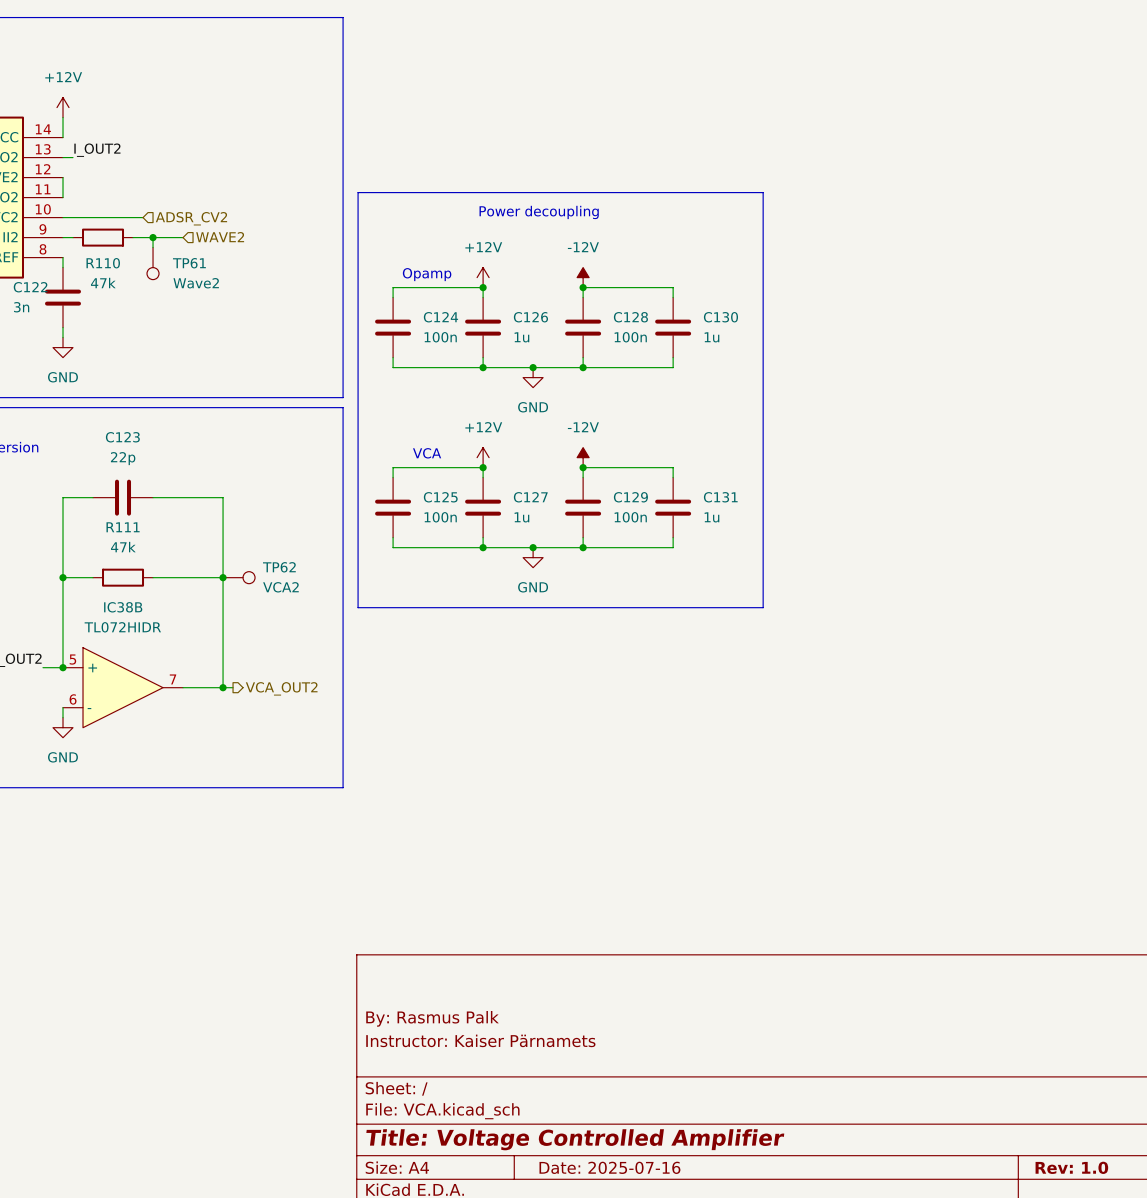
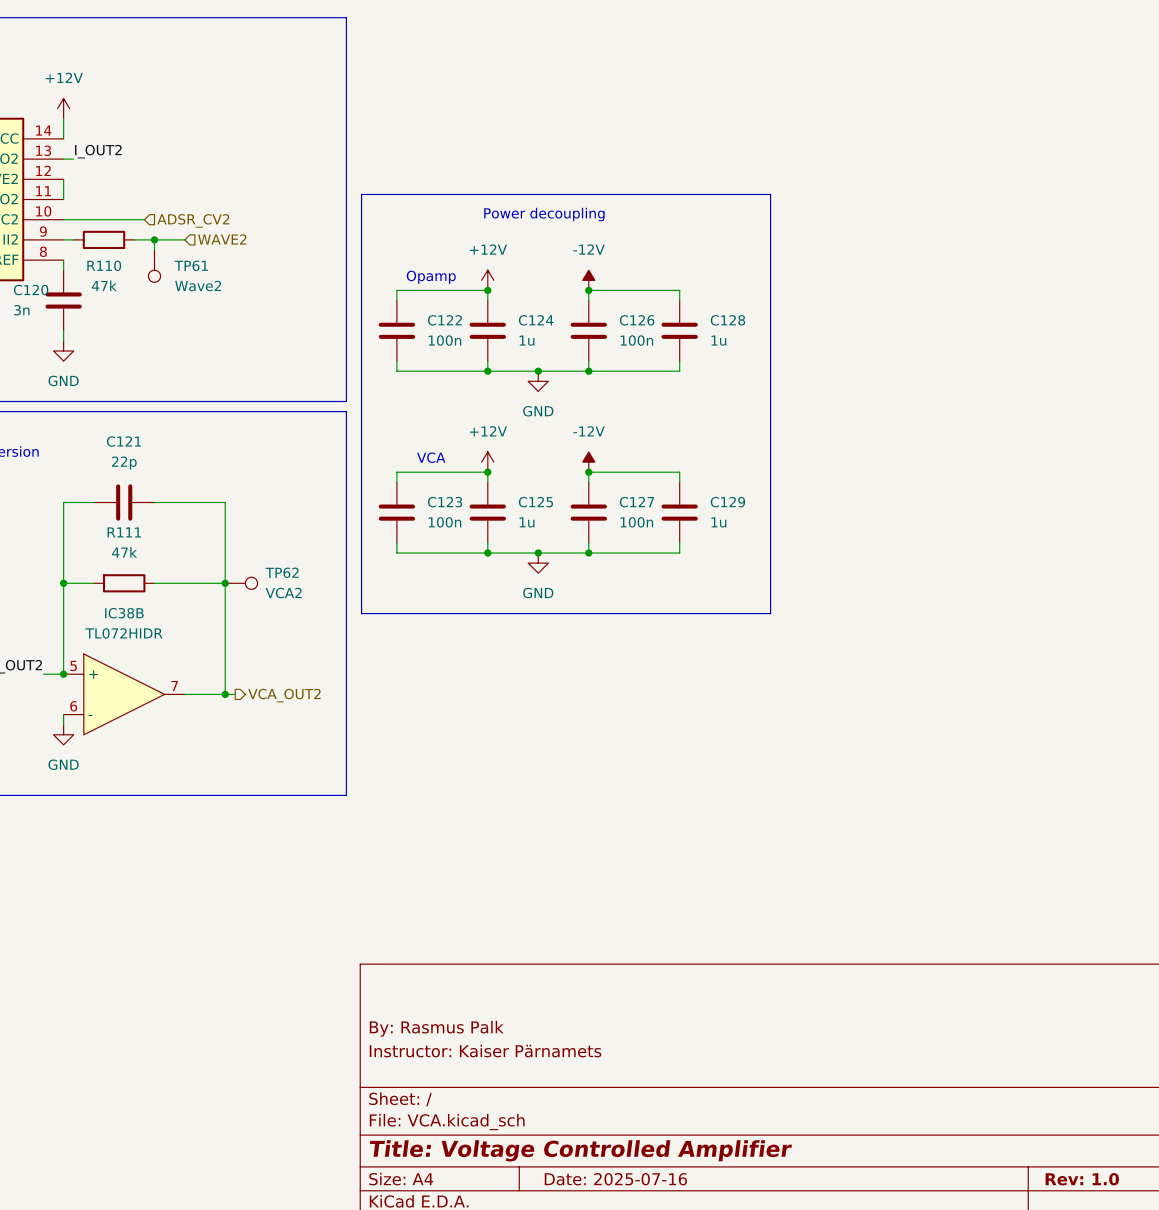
C122 name: C122 (30, 287) -> C120 (31, 290)
C124 name: C124 (440, 317) -> C122 (444, 320)
C126 name: C126 (530, 317) -> C124 (536, 320)
C128 name: C128 (630, 317) -> C126 (637, 320)
C130 name: C130 (720, 317) -> C128 (727, 320)
C123 name: C123 (122, 437) -> C121 (123, 441)
C125 name: C125 (440, 497) -> C123 (445, 502)
C127 name: C127 (530, 497) -> C125 (535, 502)
C129 name: C129 (630, 497) -> C127 (636, 502)
C131 name: C131 (720, 497) -> C129 (727, 502)

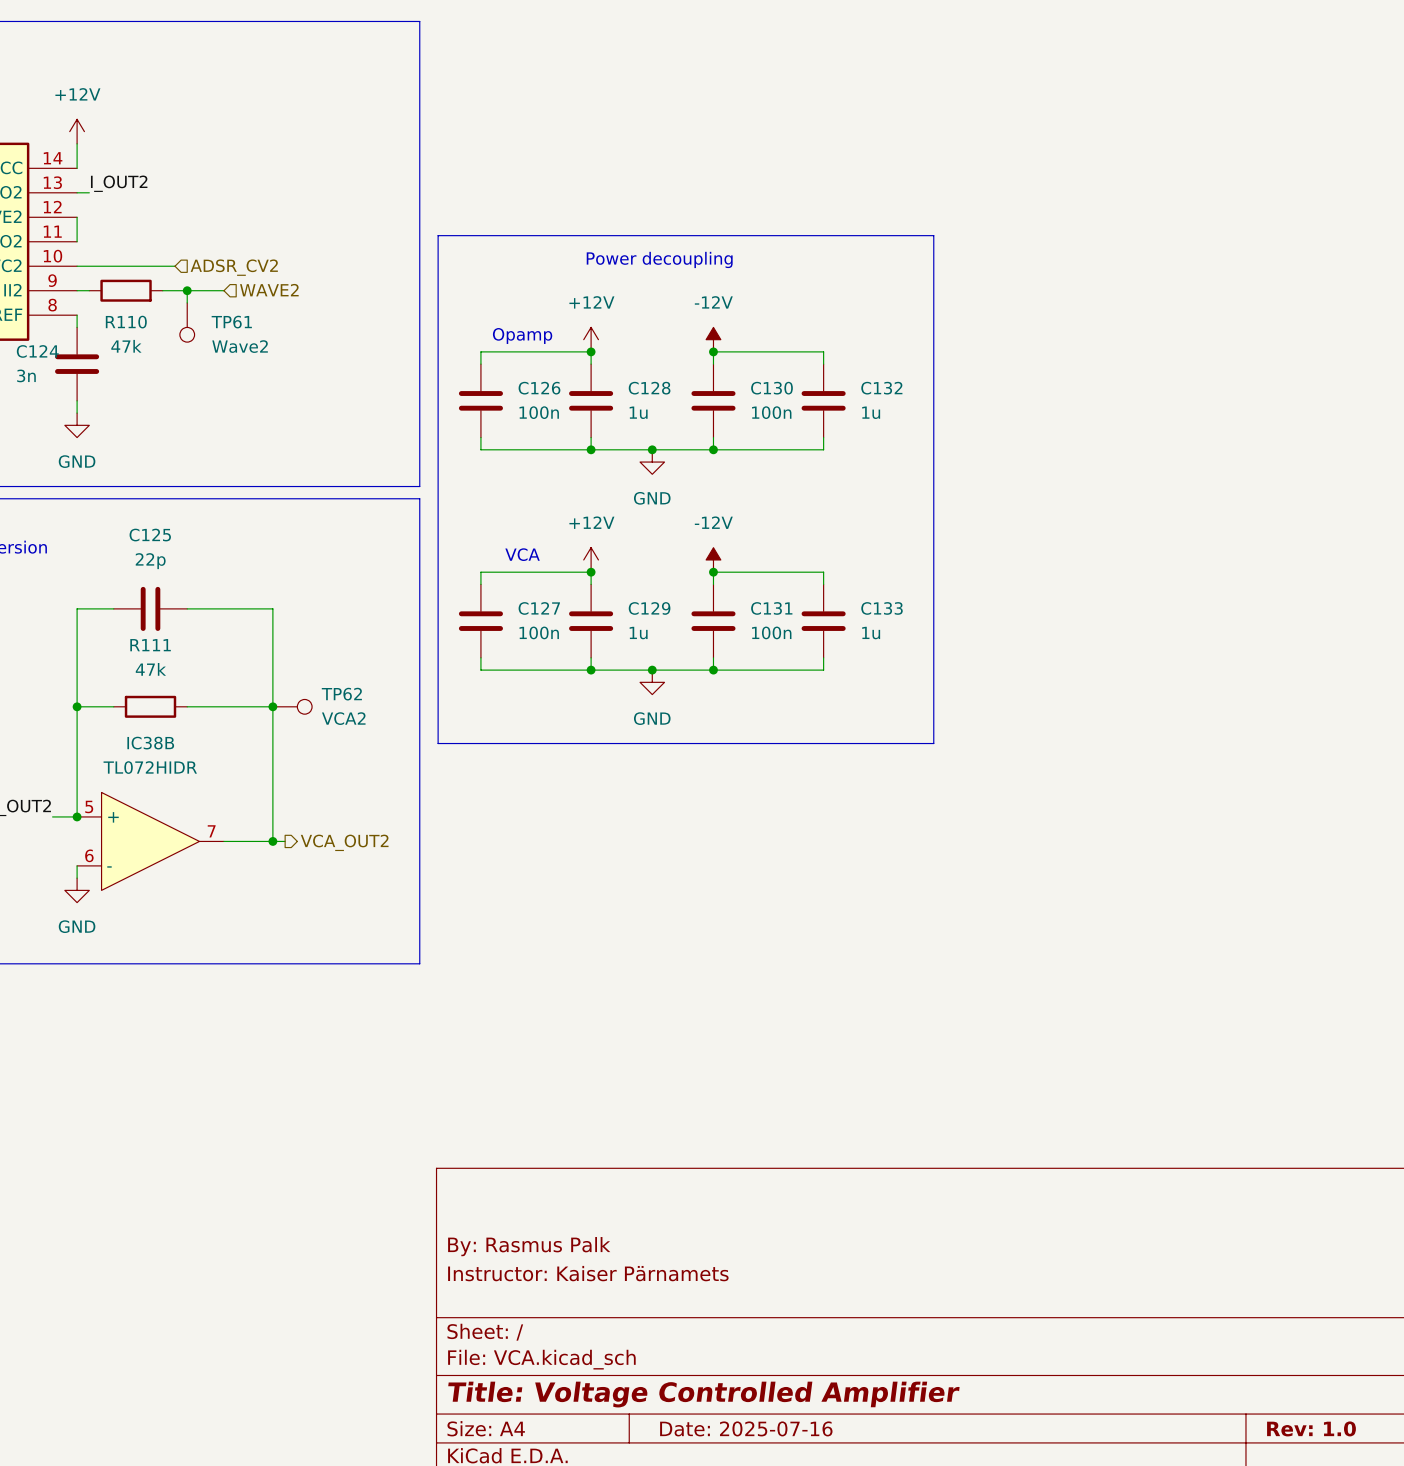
C120 name: C120 (31, 290) -> C124 (37, 351)
C122 name: C122 (444, 320) -> C126 (539, 388)
C124 name: C124 (536, 320) -> C128 (649, 388)
C126 name: C126 (637, 320) -> C130 (771, 388)
C128 name: C128 (727, 320) -> C132 (881, 388)
C121 name: C121 (123, 441) -> C125 (150, 535)
C123 name: C123 (445, 502) -> C127 (539, 608)
C125 name: C125 (535, 502) -> C129 (649, 608)
C127 name: C127 (636, 502) -> C131 (771, 608)
C129 name: C129 (727, 502) -> C133 (882, 608)

